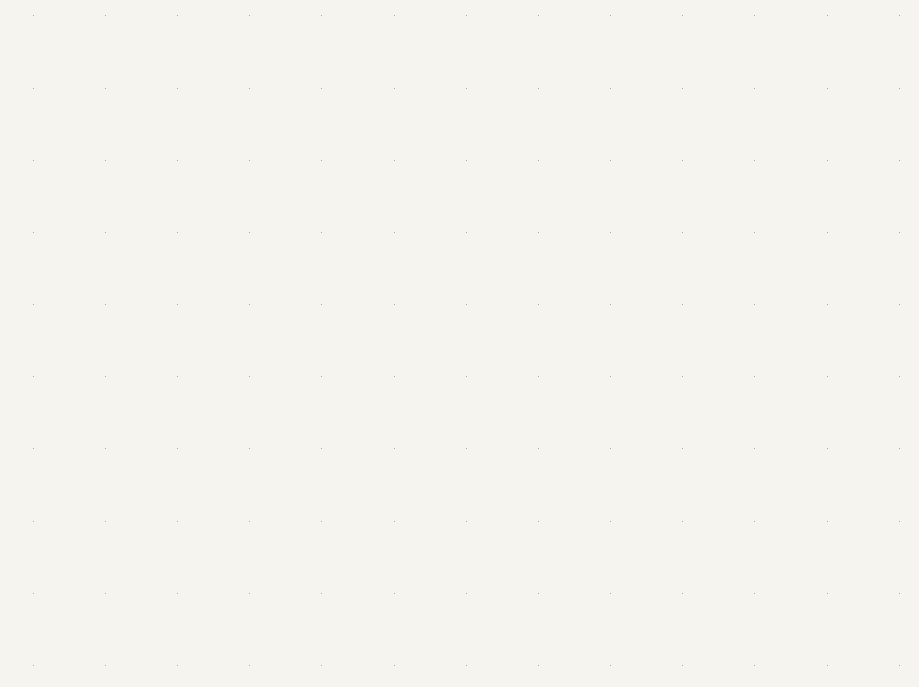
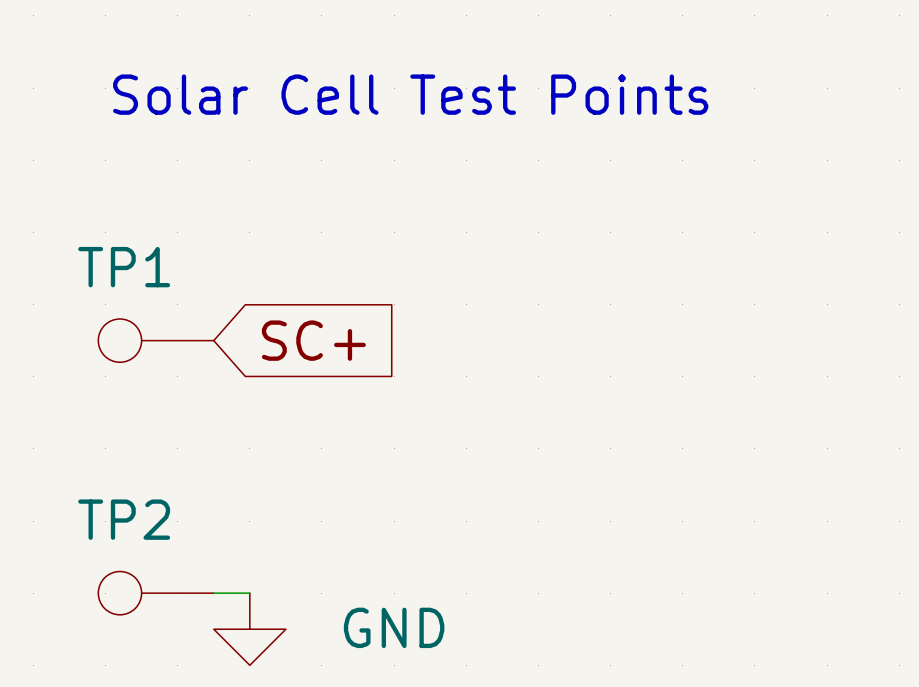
text: none -> Solar Cell Test Points (410, 94)
TP1: none -> (156, 340)
global label: none -> SC+ (313, 340)
TP2: none -> (156, 593)
wire: none -> (213, 593) (249, 593)
power symbol: none -> GND (249, 629)

